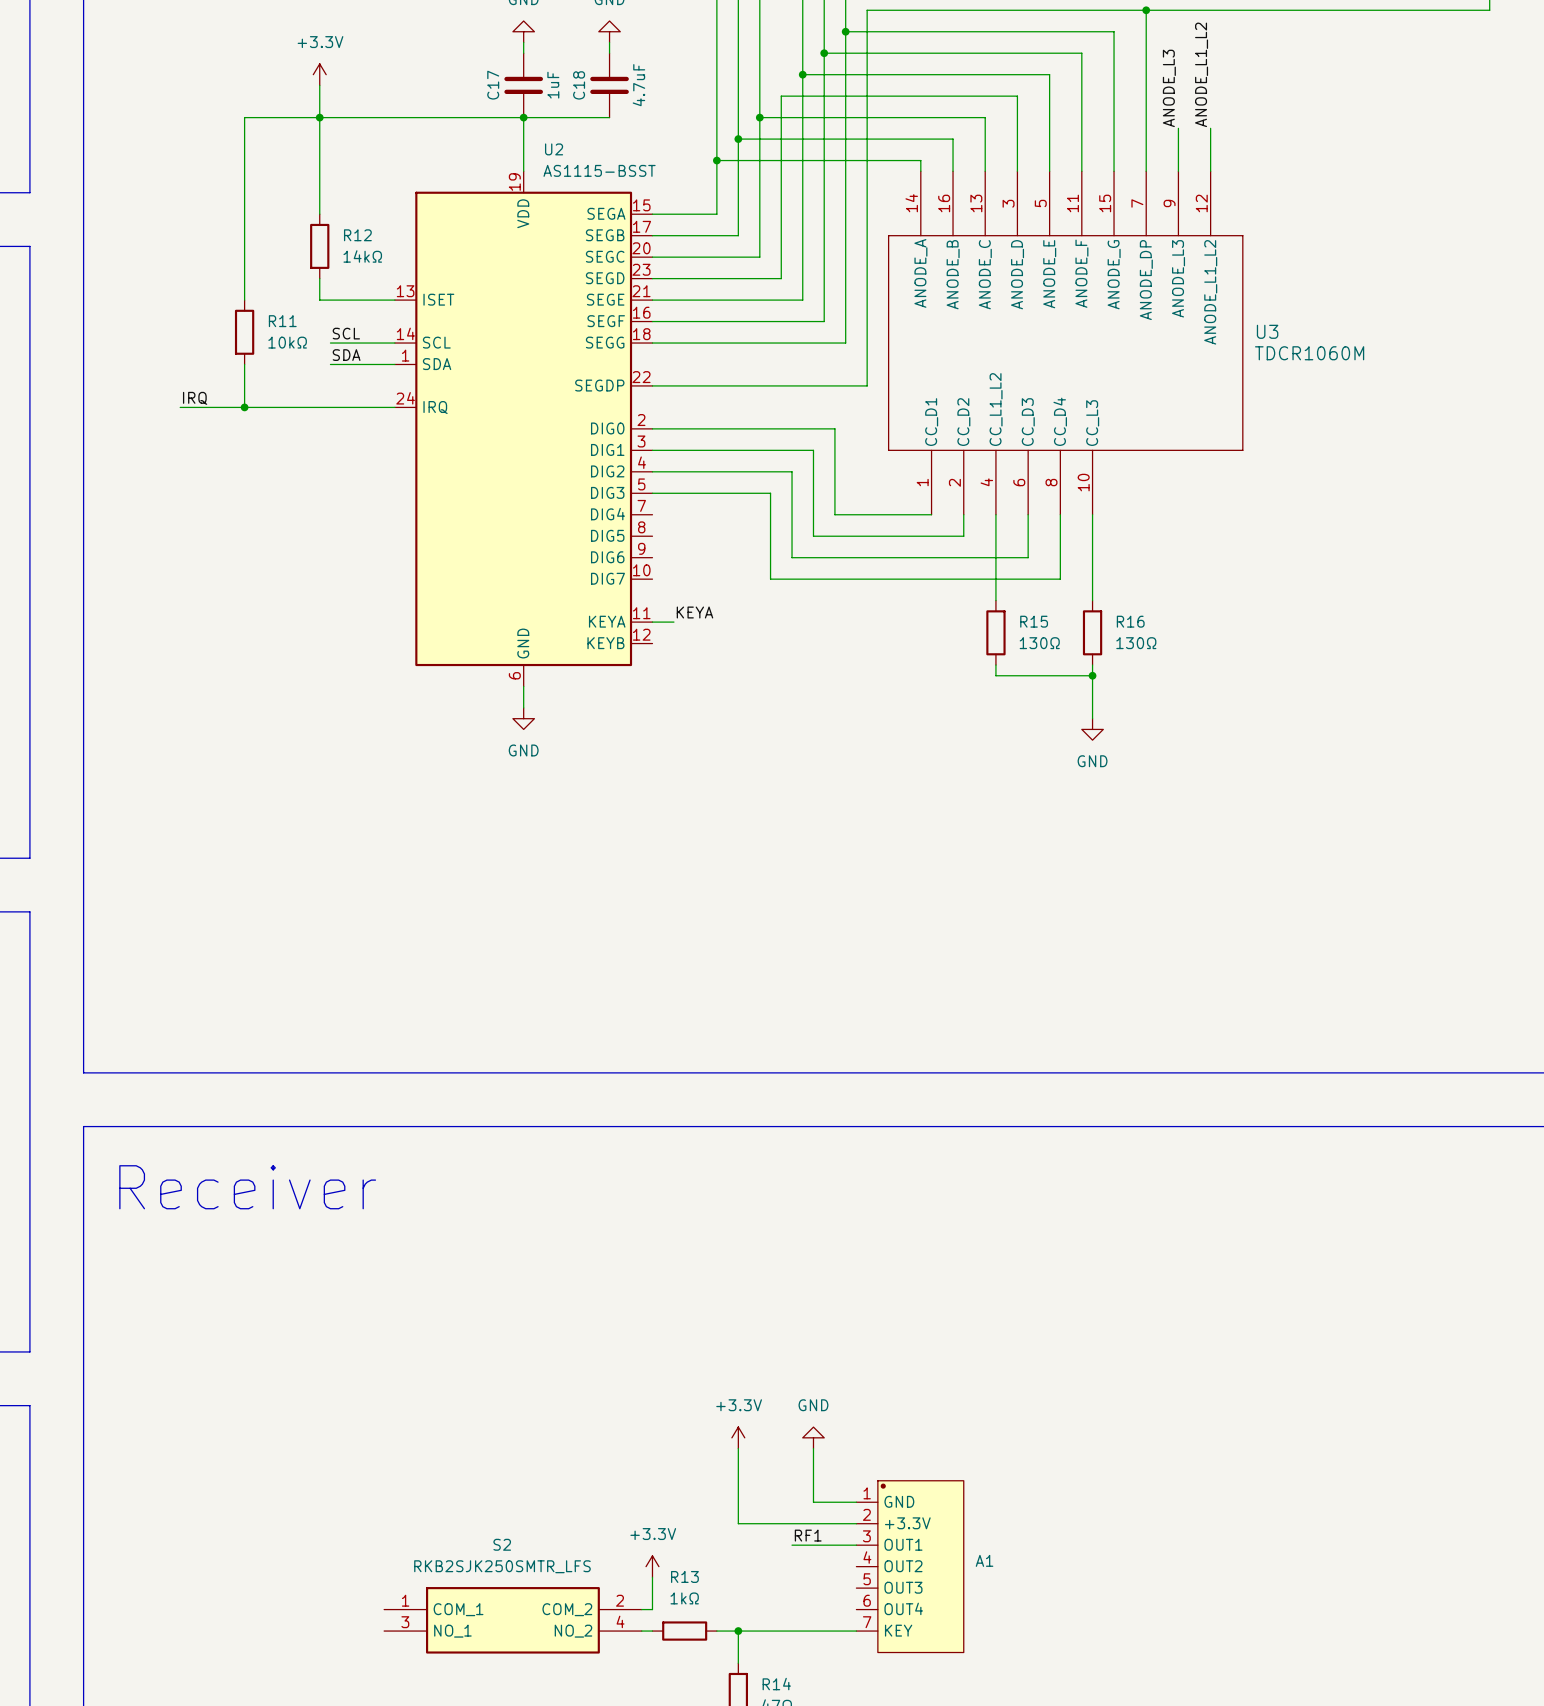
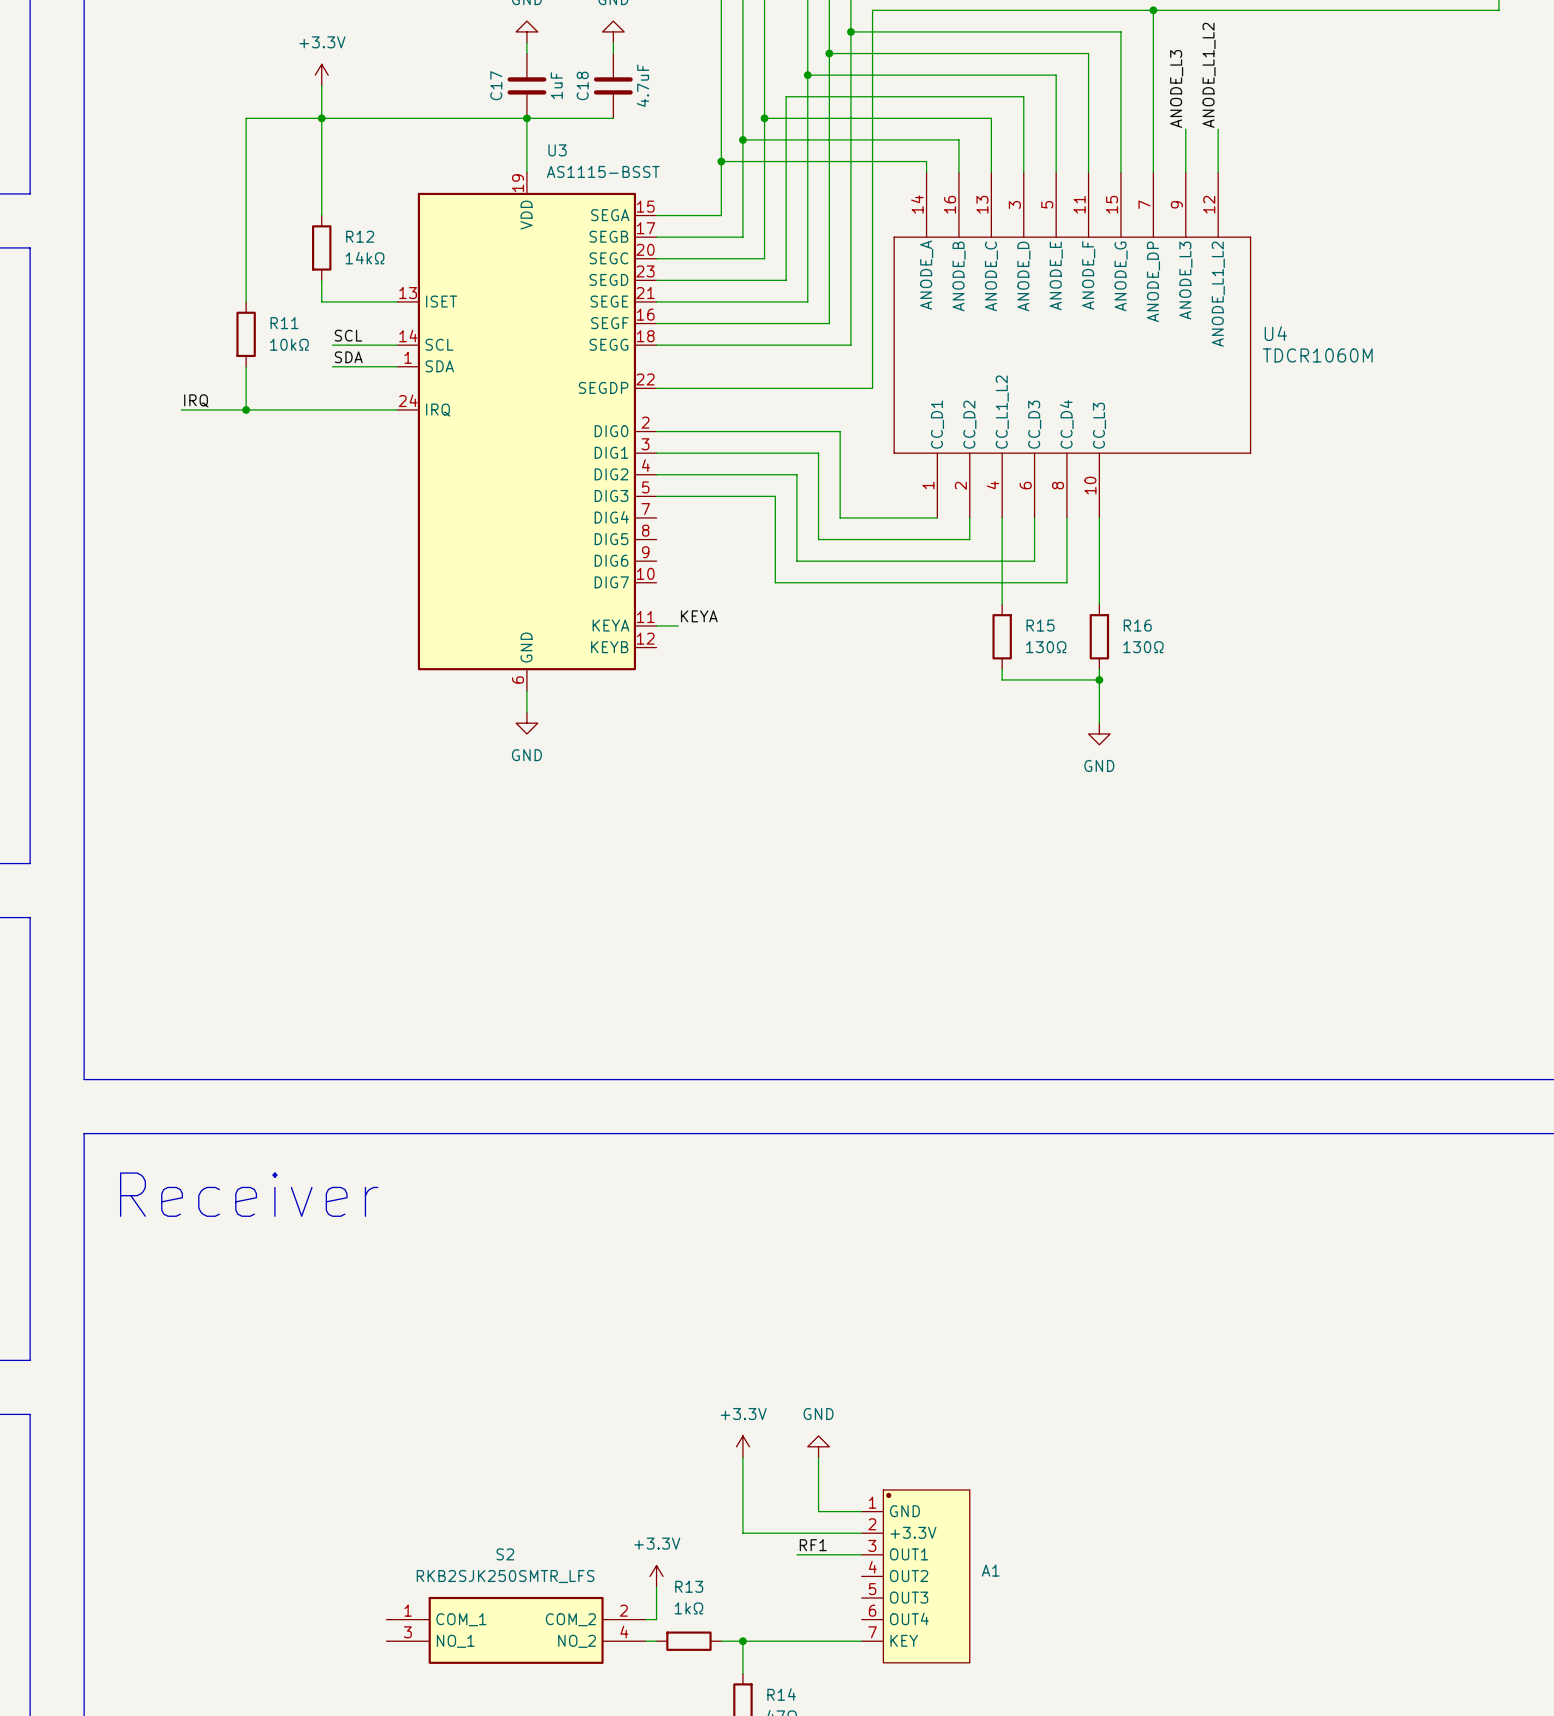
U2 name: U2 (554, 149) -> U3 (557, 150)
U3 name: U3 (1267, 331) -> U4 (1275, 333)

